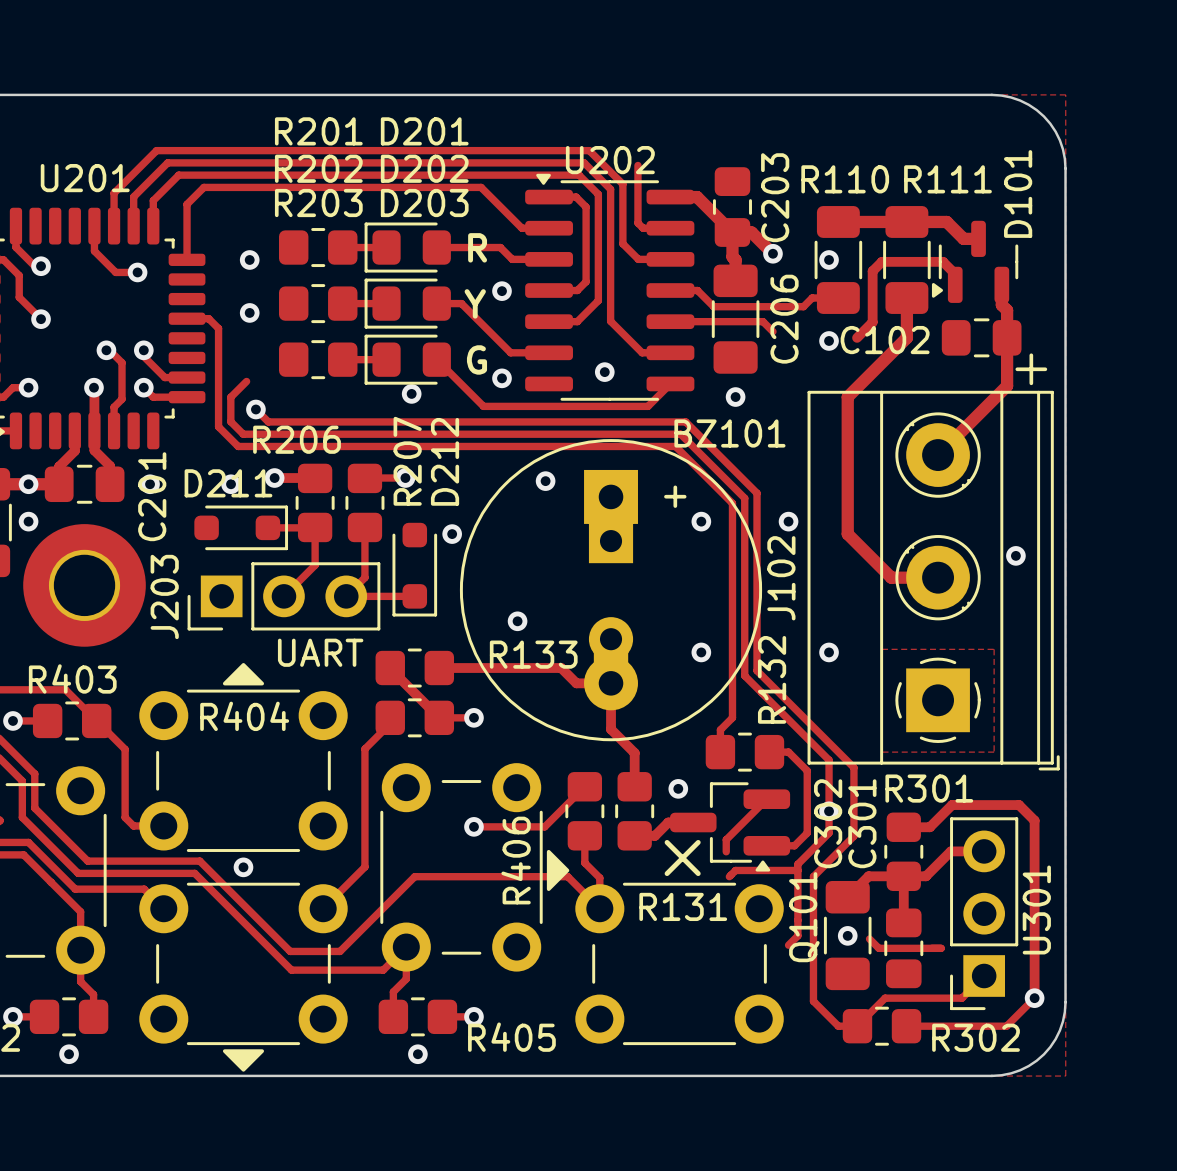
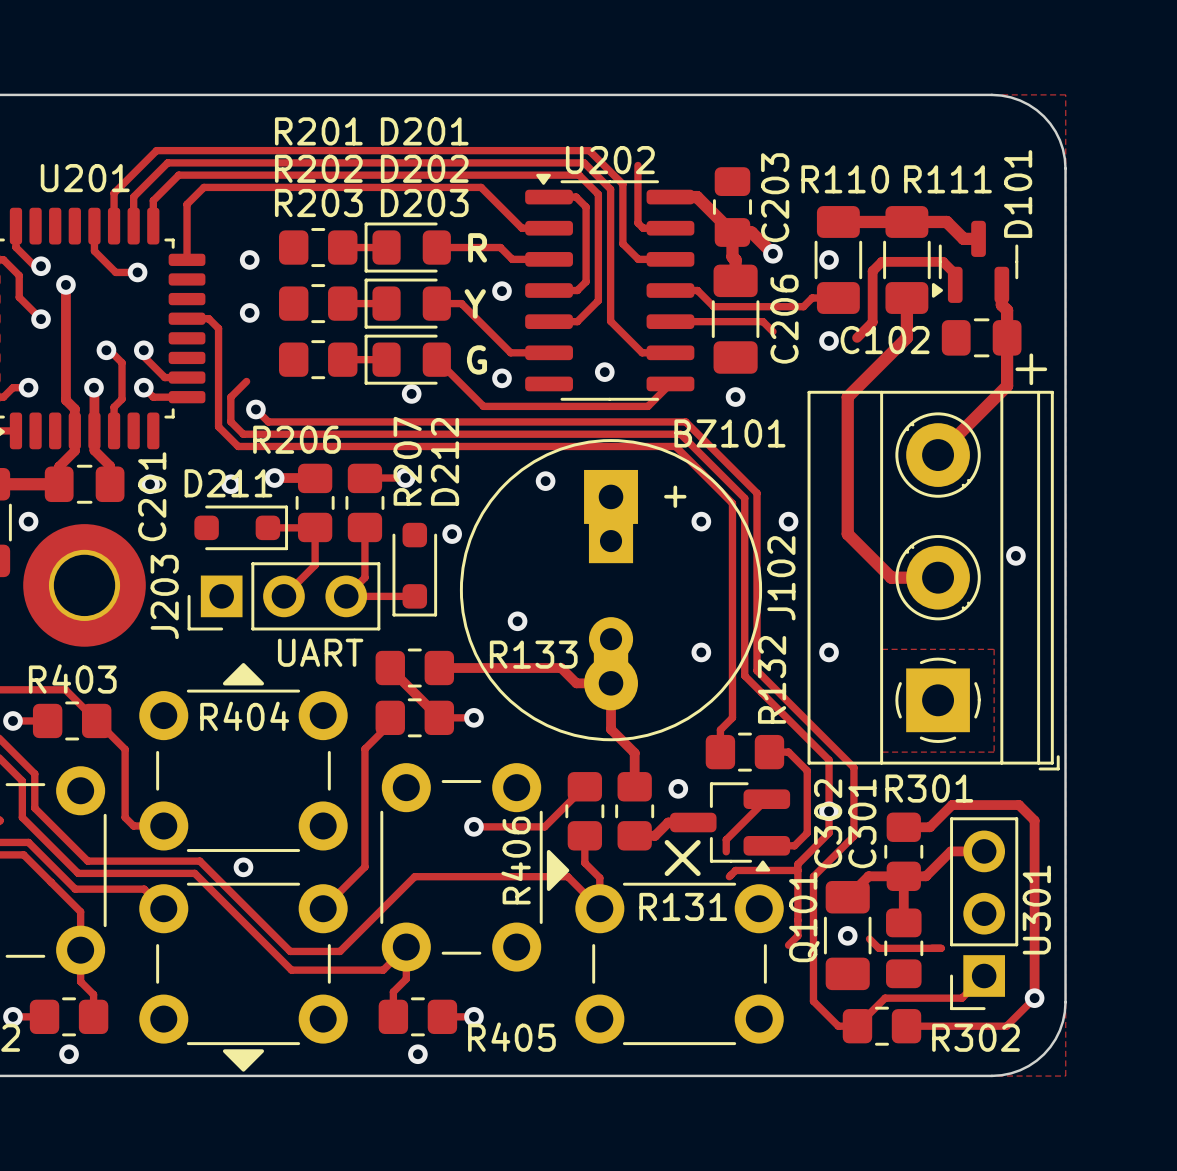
track: none -> (65, 284) (65, 400) (74, 409) (74, 430)
via: none -> (65, 284)
via: (28, 484) -> none

